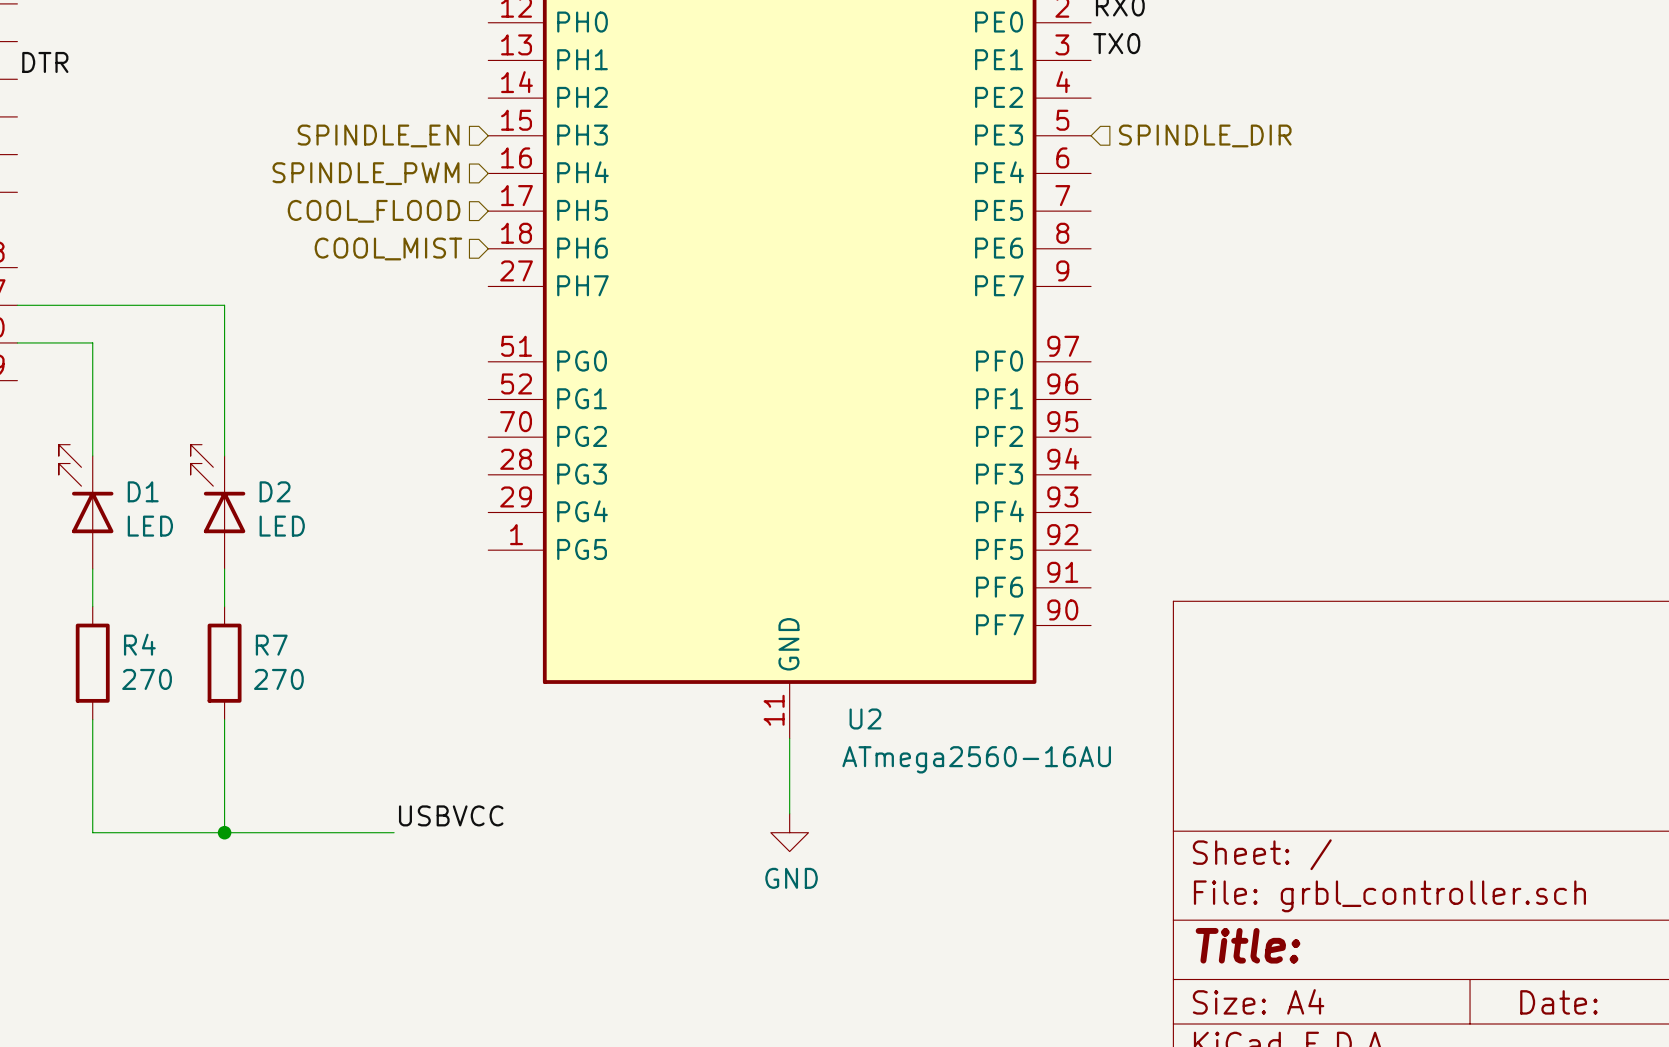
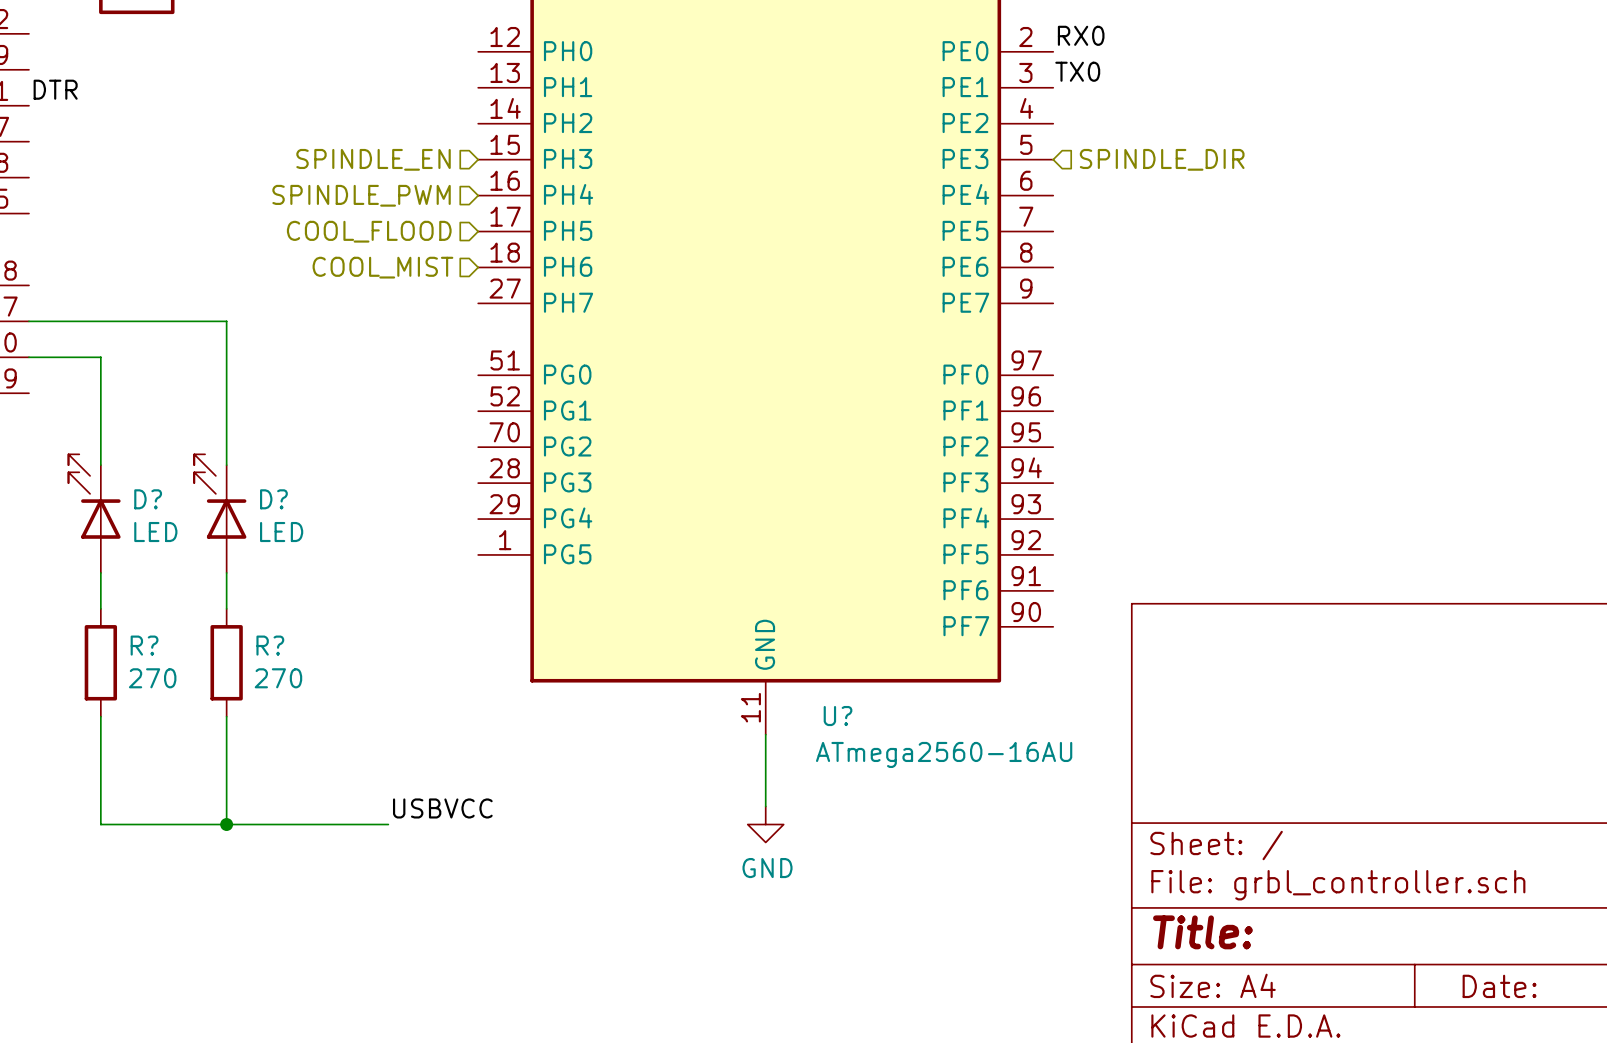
D1 name: D1 (143, 491) -> D? (148, 499)
D2 name: D2 (275, 491) -> D? (273, 499)
R4 name: R4 (139, 644) -> R? (144, 645)
R7 name: R7 (271, 645) -> R? (270, 645)
U2 name: U2 (865, 718) -> U? (838, 716)

